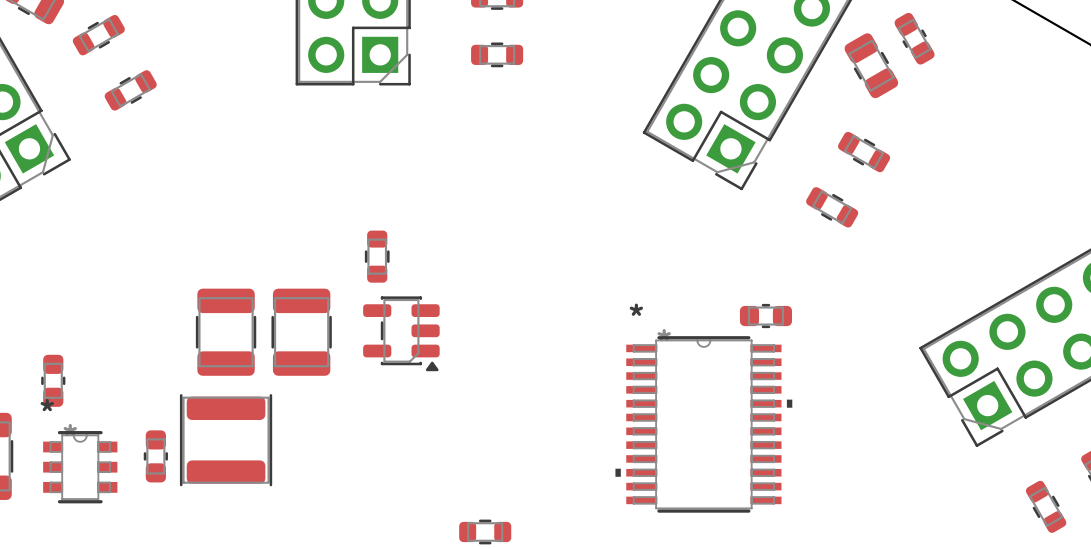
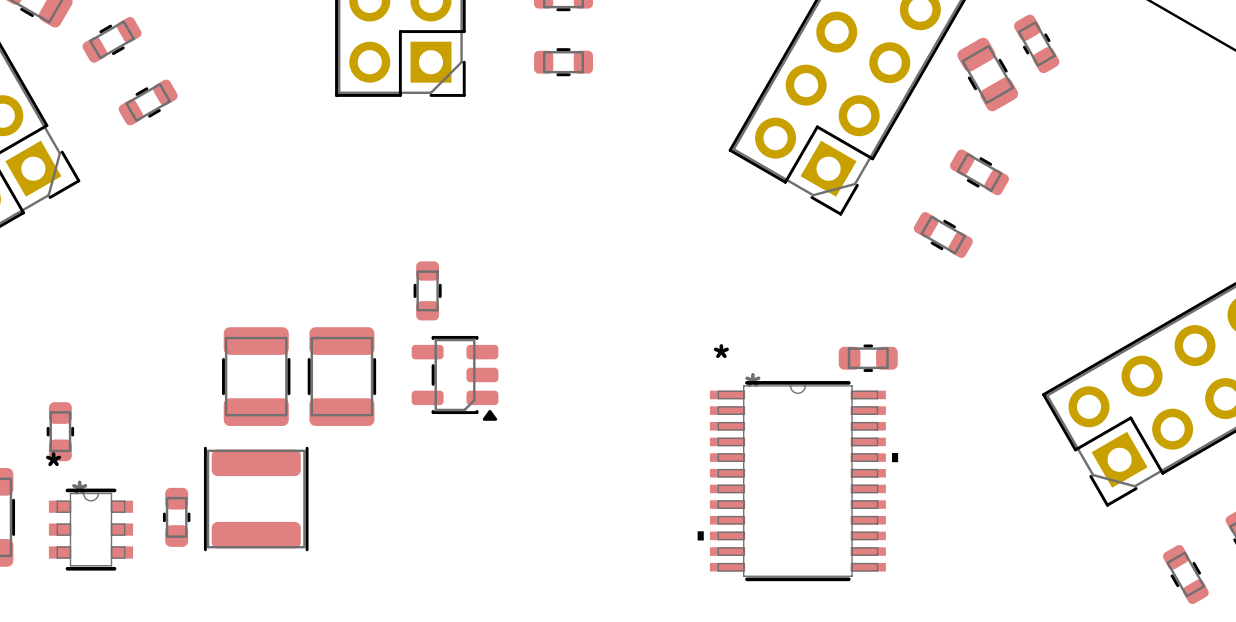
part: (485, 531) -> none

